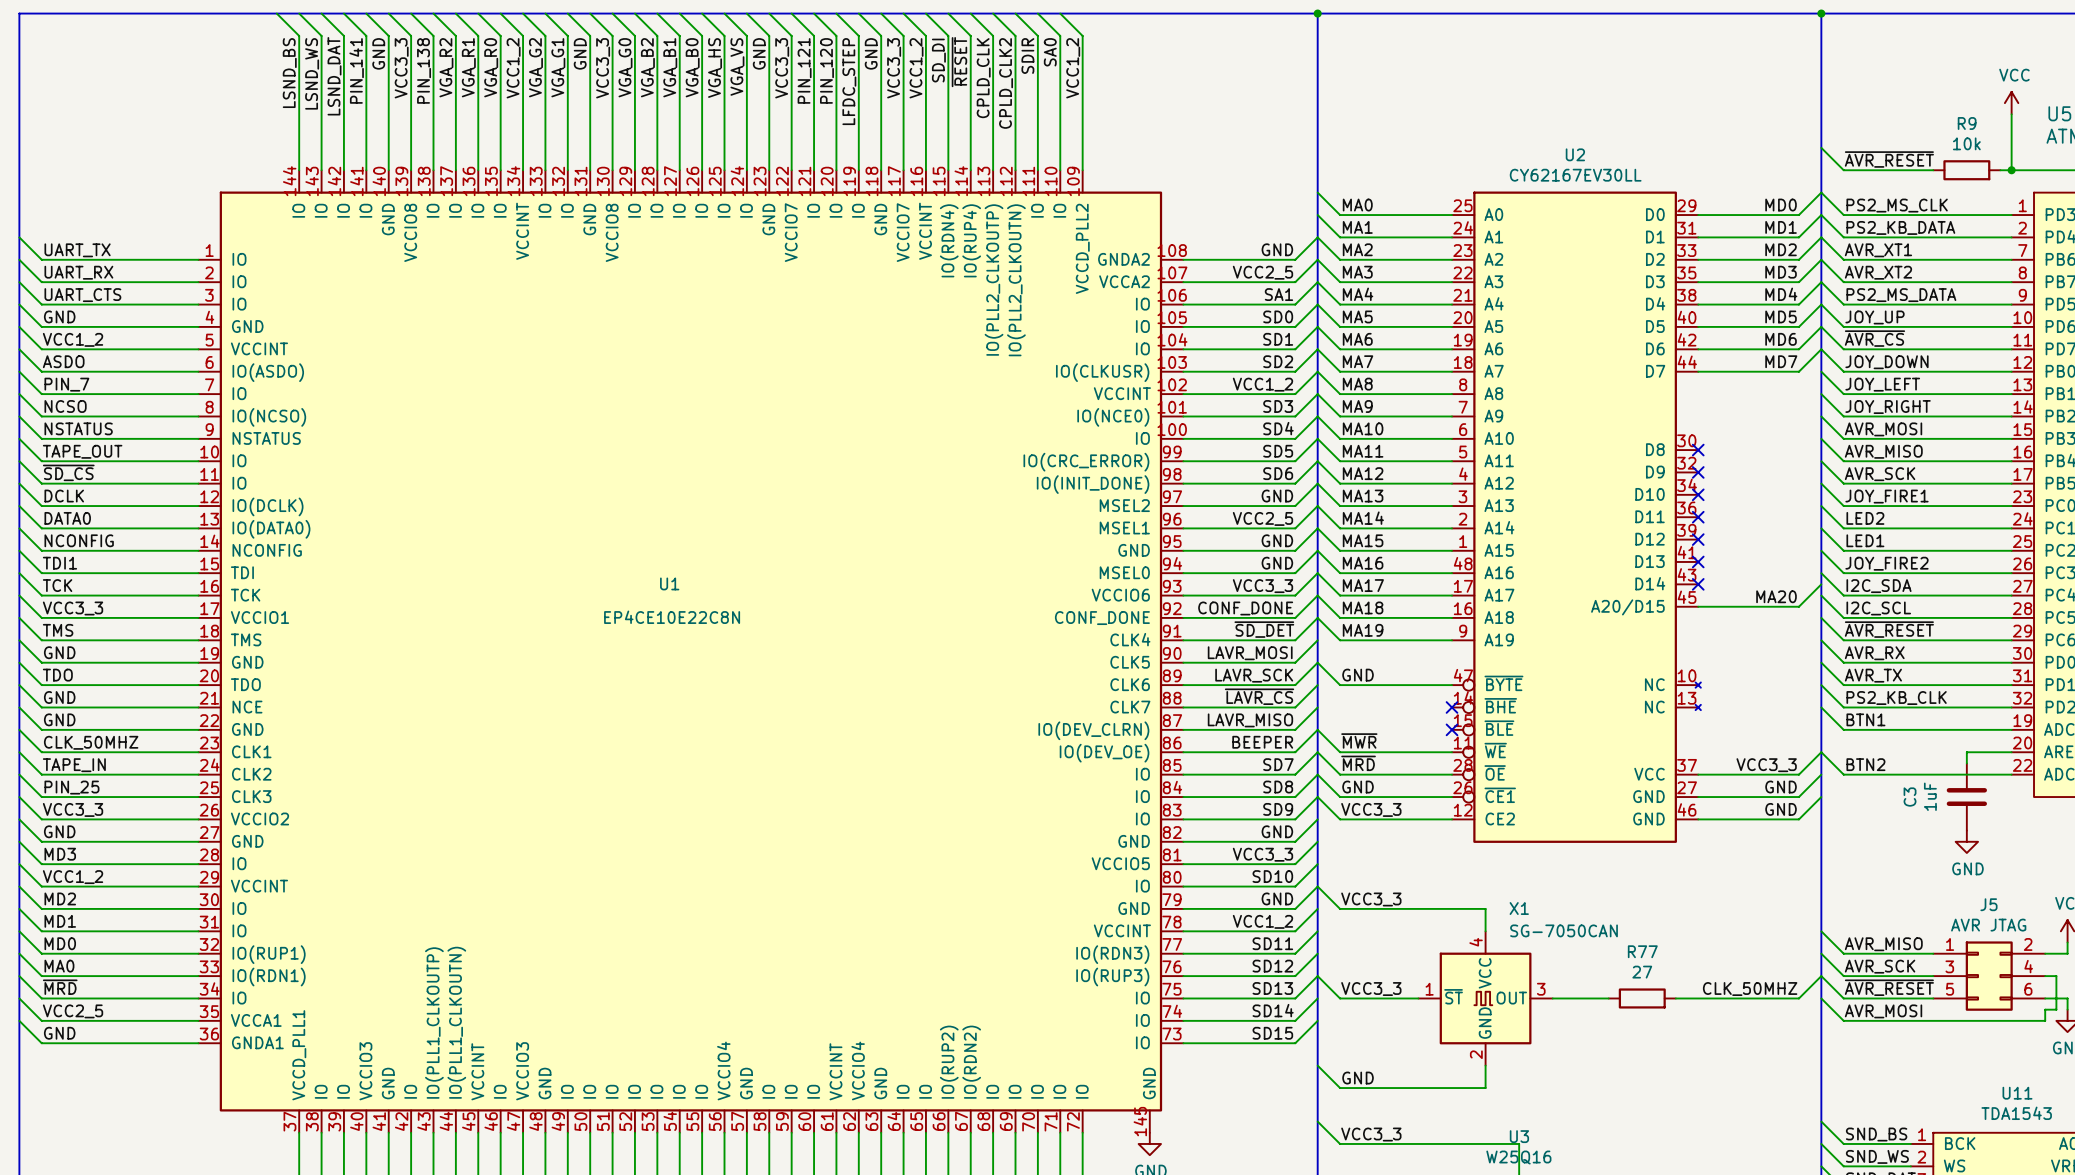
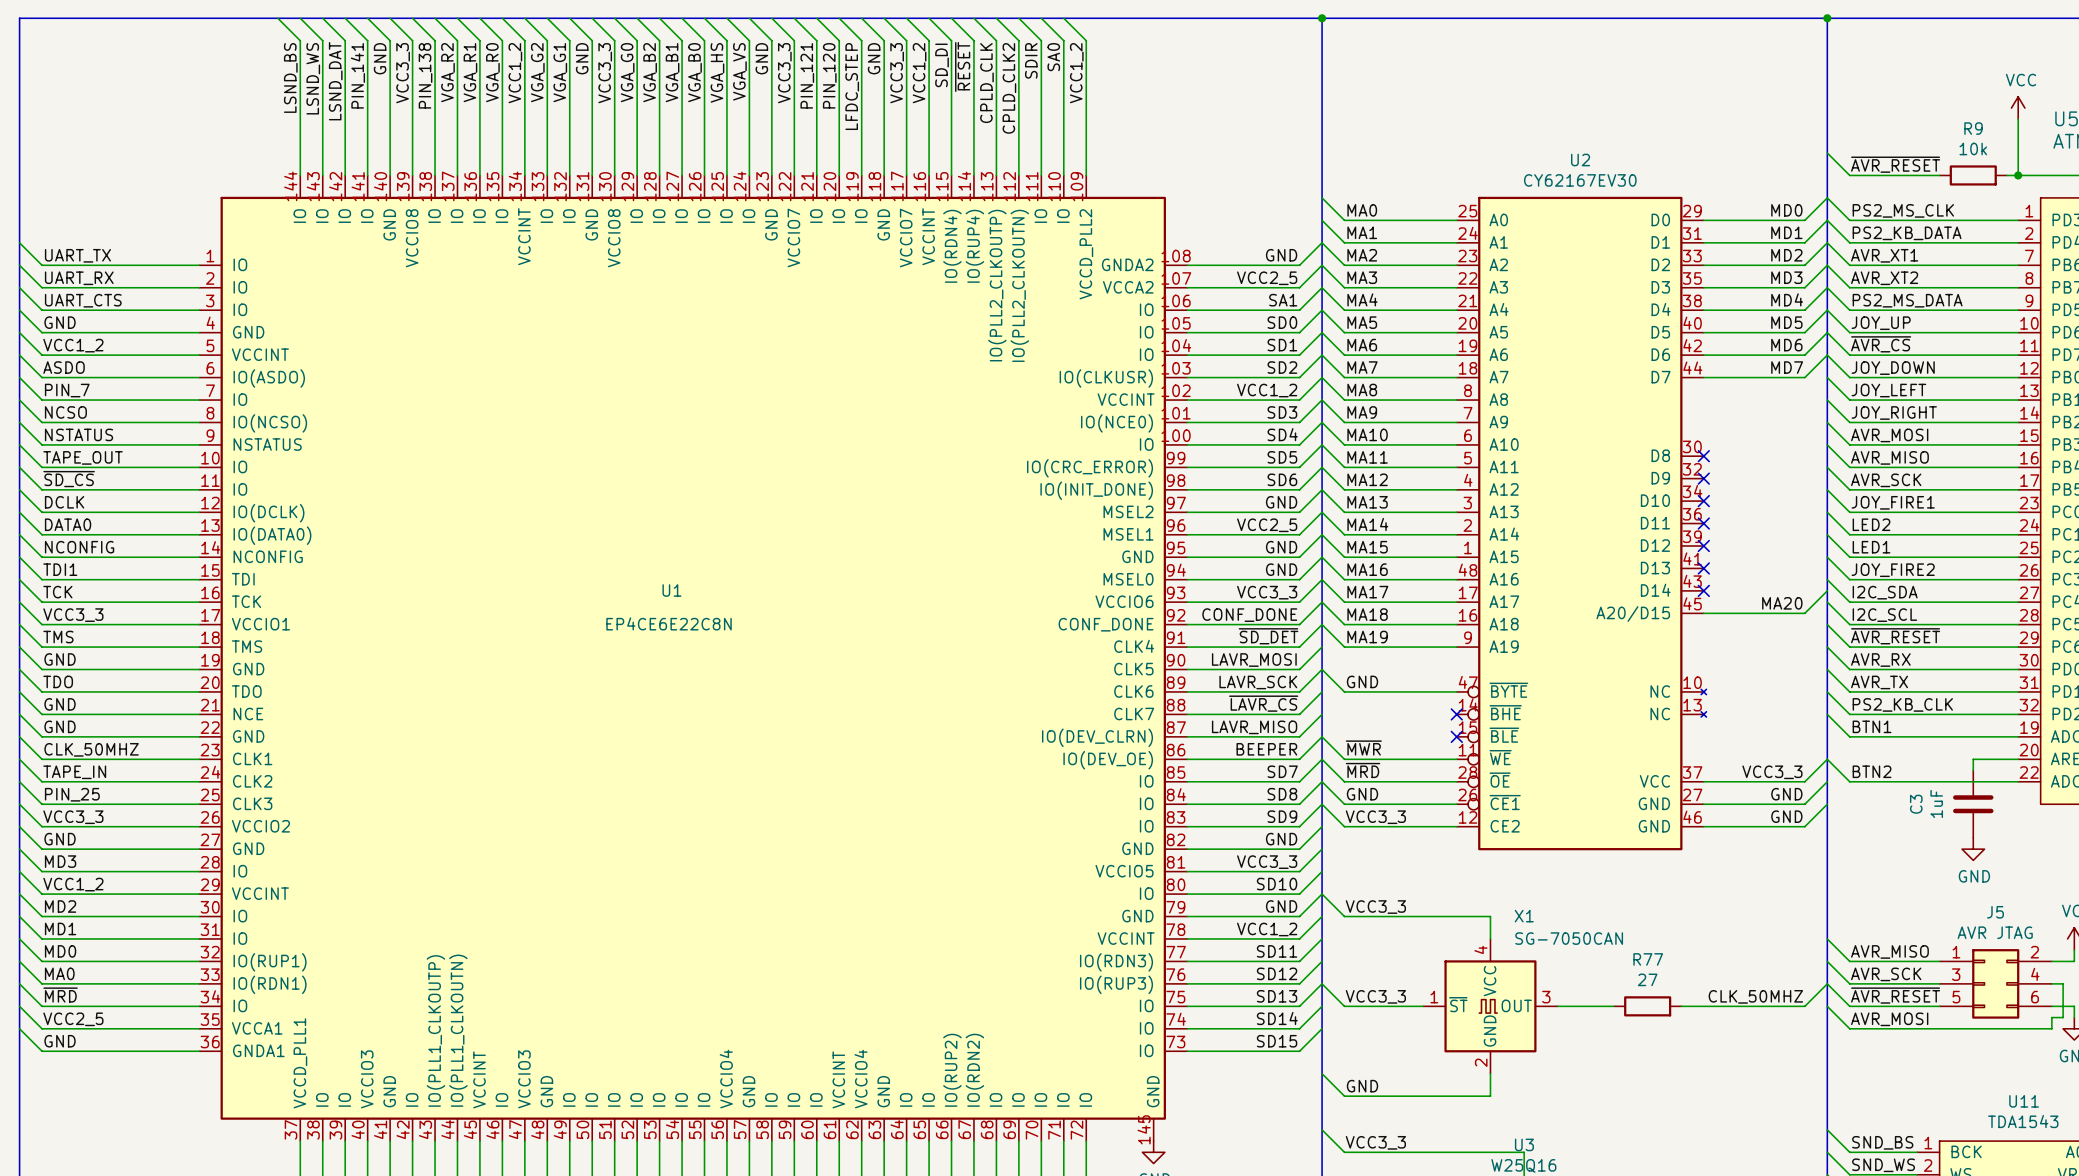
U2 value: CY62167EV30LL (1575, 175) -> CY62167EV30 (1580, 180)
U1 value: EP4CE10E22C8N (672, 617) -> EP4CE6E22C8N (669, 623)

